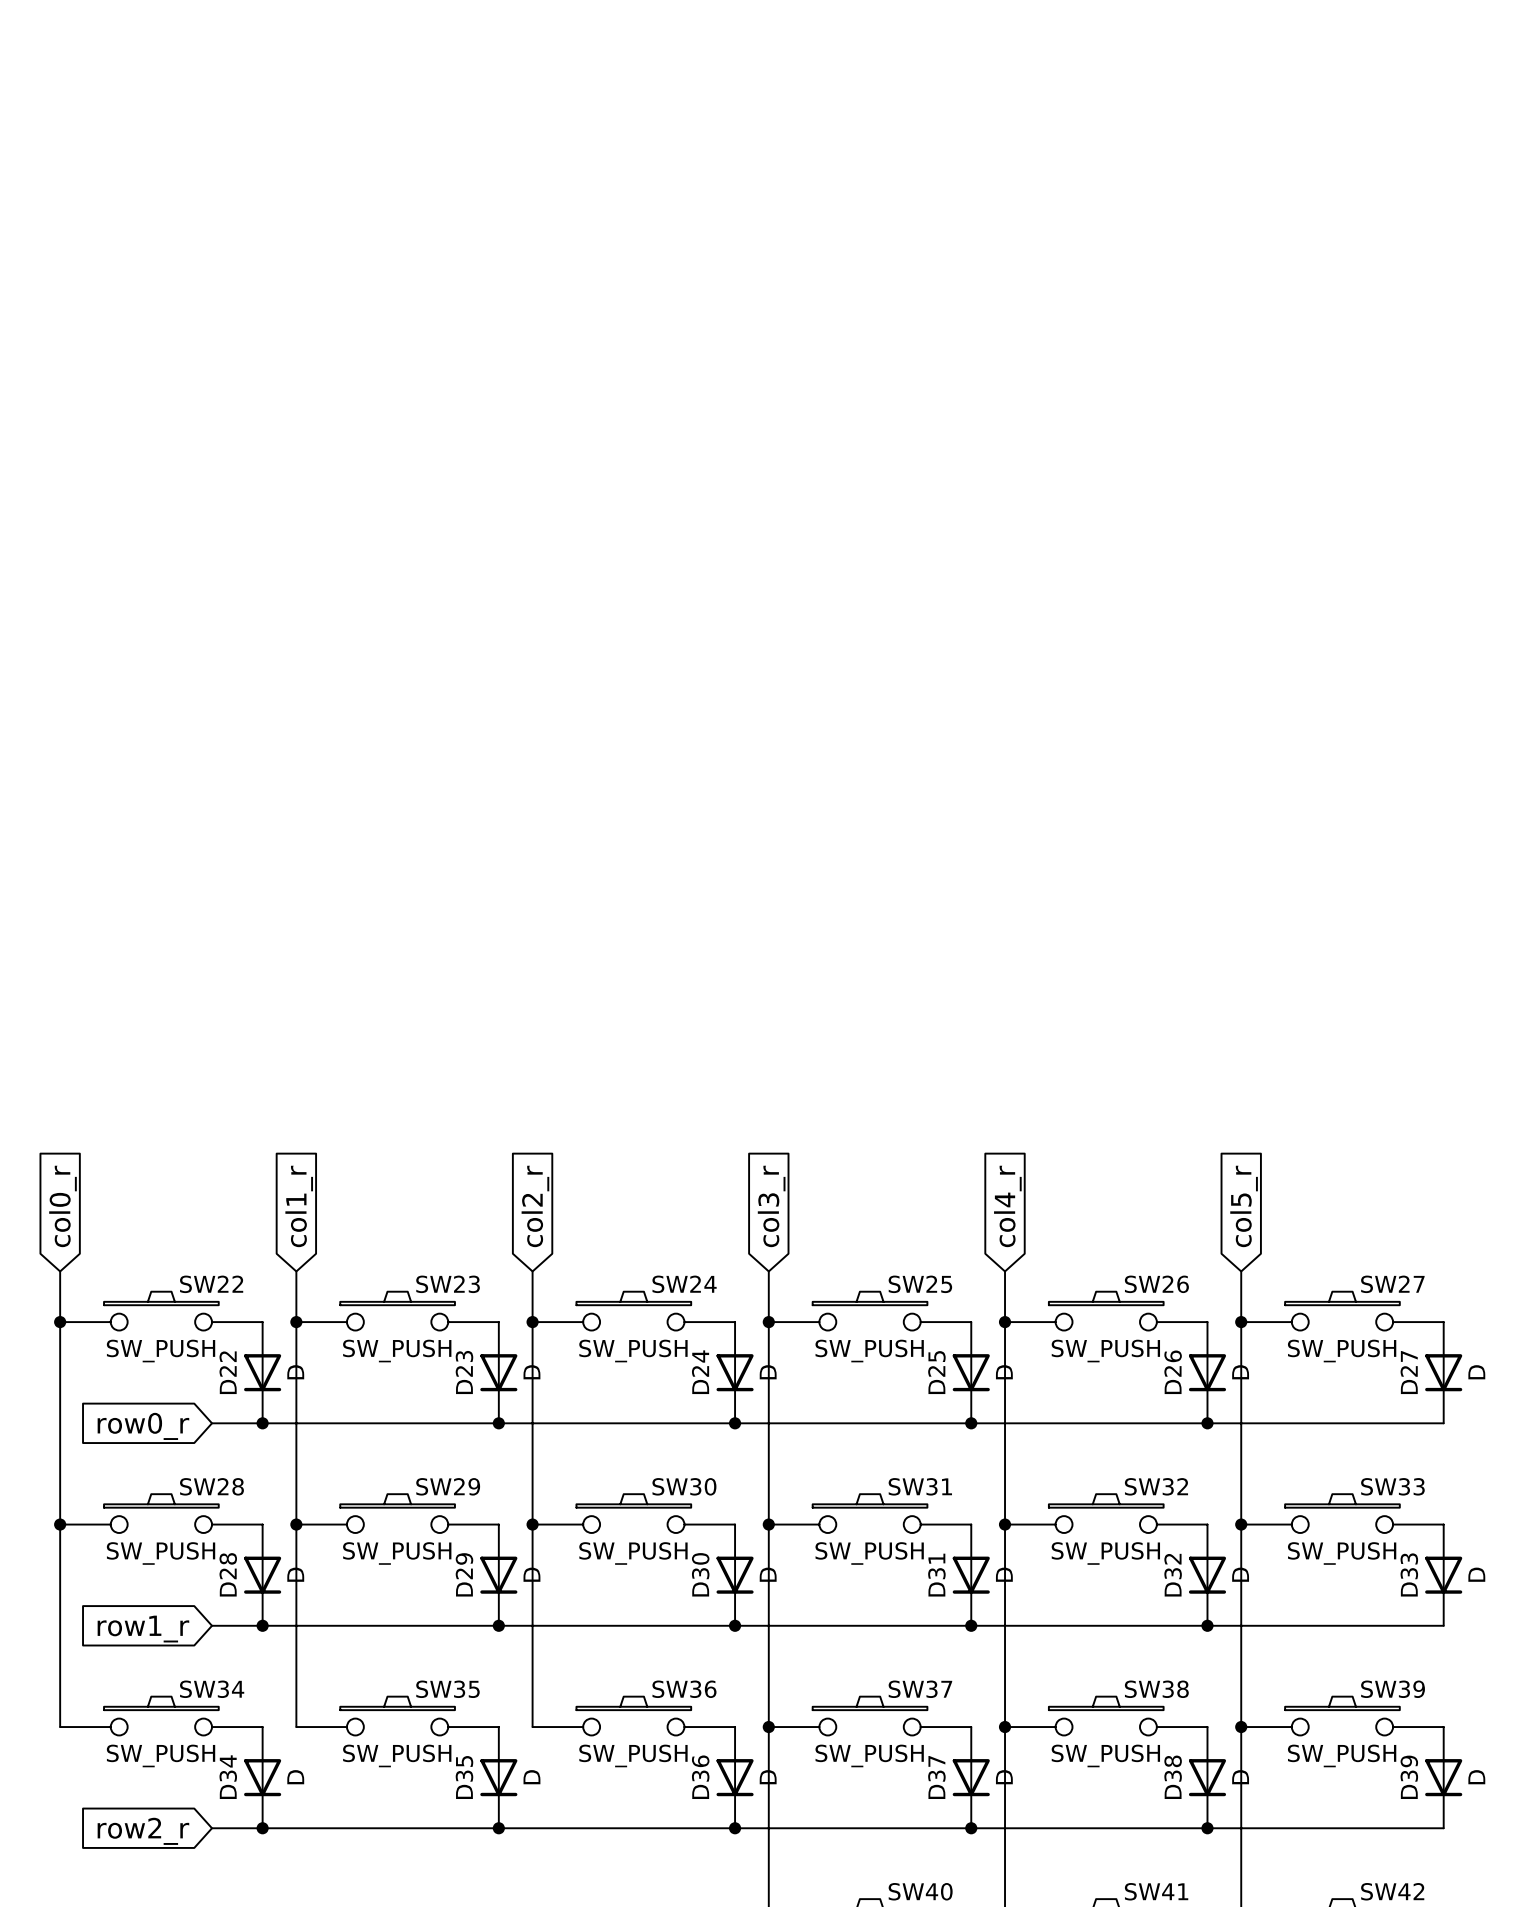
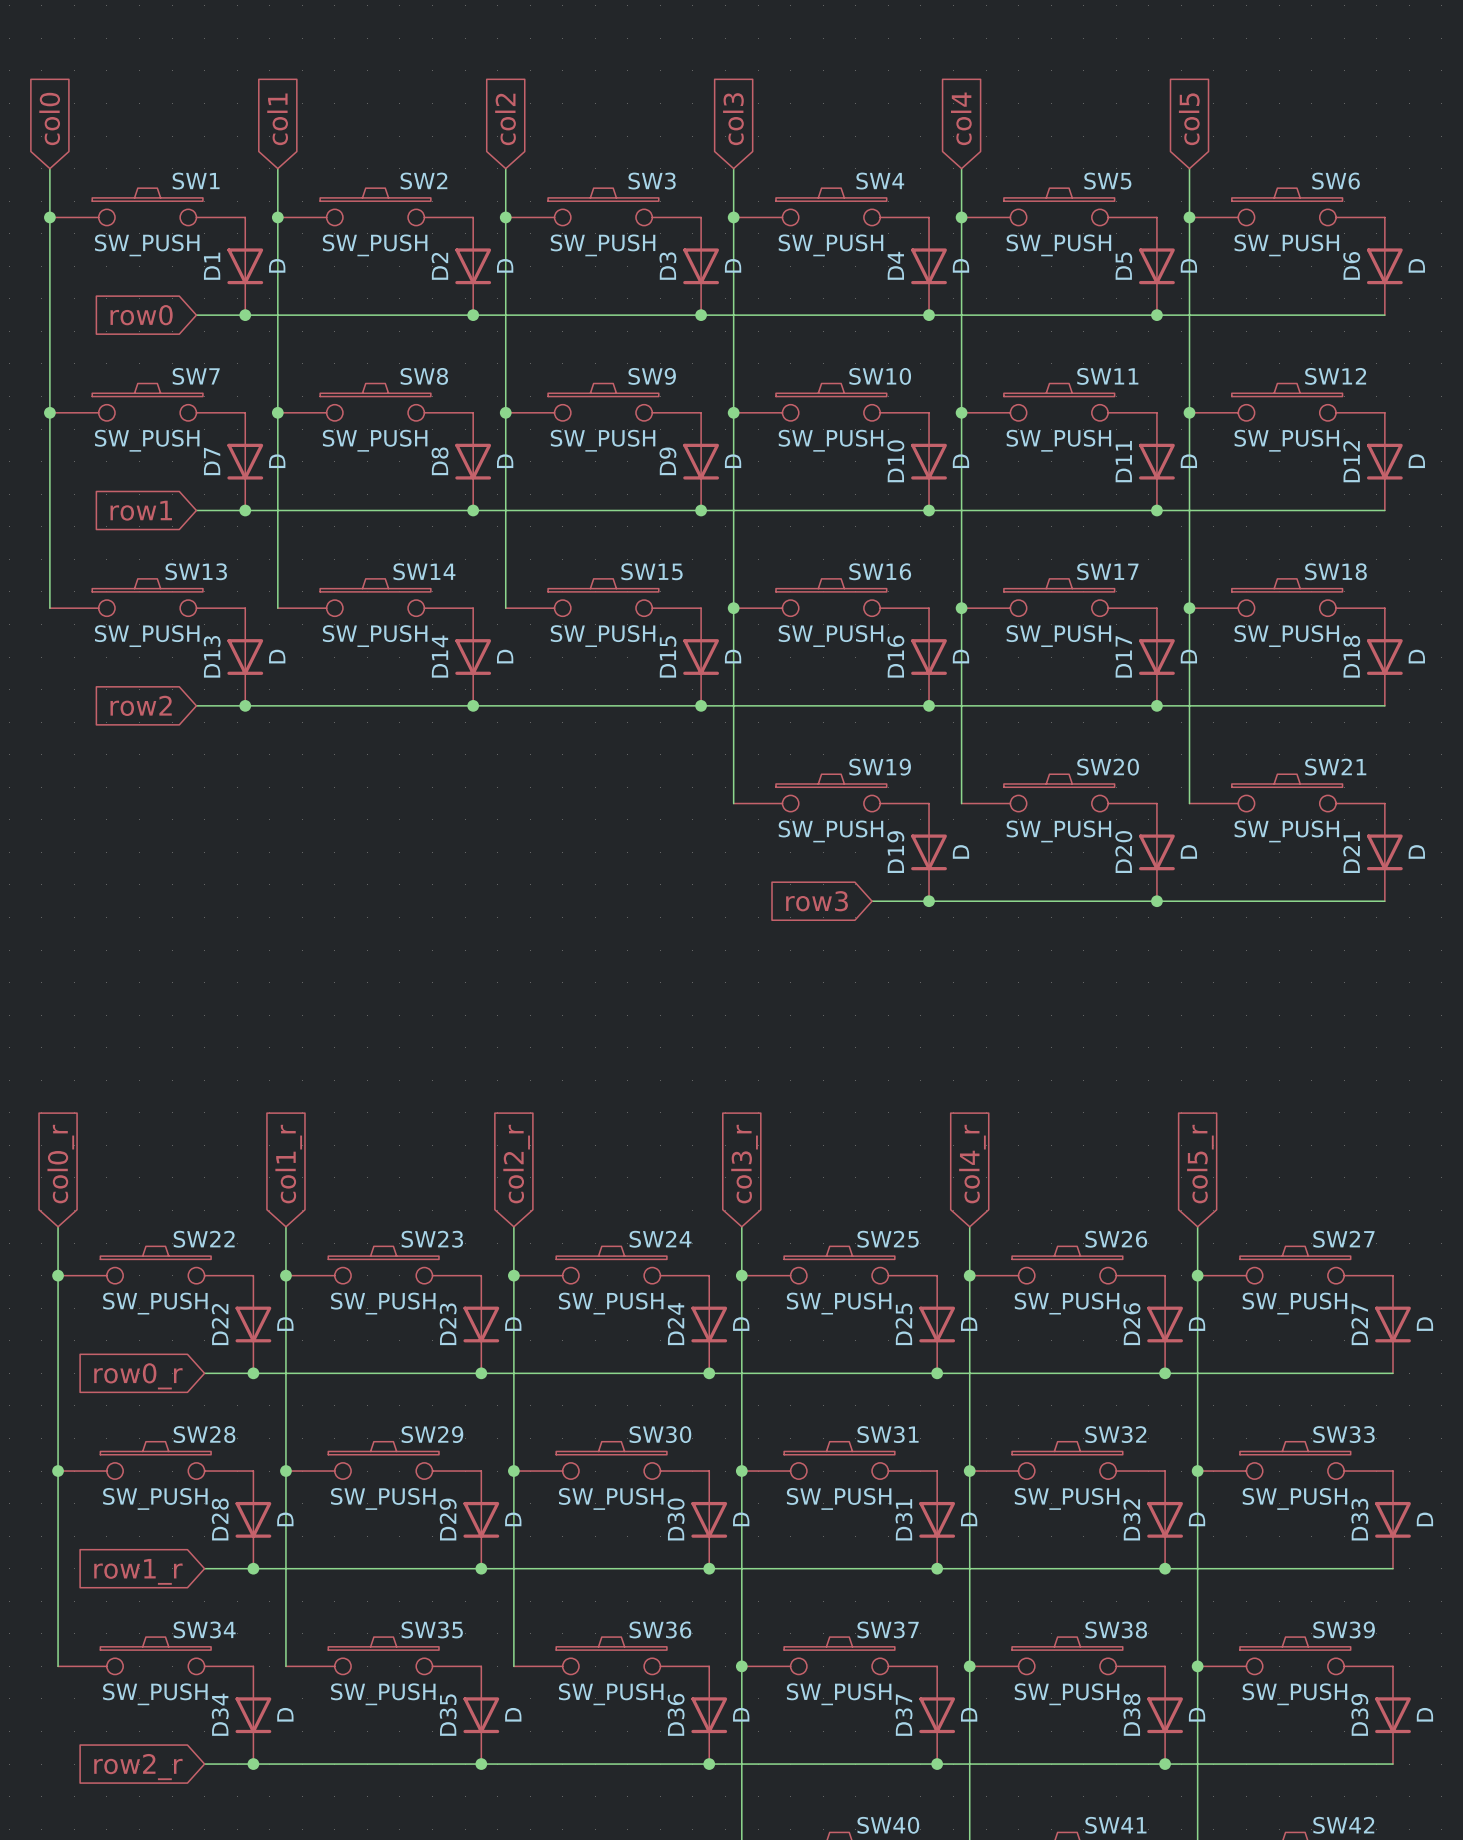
global label: none -> col0 (49, 118)
global label: none -> col1 (277, 119)
global label: none -> col2 (505, 119)
global label: none -> col3 (733, 119)
global label: none -> col4 (961, 118)
global label: none -> col5 (1189, 119)
wire: none -> (49, 168) (49, 608)
wire: none -> (277, 168) (277, 608)
wire: none -> (505, 168) (505, 608)
wire: none -> (733, 168) (733, 803)
wire: none -> (961, 168) (961, 803)
wire: none -> (1189, 168) (1189, 803)
SW1: none -> SW_PUSH (147, 206)
SW2: none -> SW_PUSH (375, 206)
SW3: none -> SW_PUSH (603, 206)
SW4: none -> SW_PUSH (831, 206)
SW5: none -> SW_PUSH (1059, 206)
SW6: none -> SW_PUSH (1287, 206)
junction: none -> (49, 217)
junction: none -> (277, 217)
junction: none -> (505, 217)
junction: none -> (733, 217)
junction: none -> (961, 217)
junction: none -> (1189, 217)
D1: none -> D (245, 266)
D2: none -> D (473, 266)
D3: none -> D (701, 266)
D4: none -> D (929, 266)
D5: none -> D (1156, 266)
D6: none -> D (1384, 266)
global label: none -> row0 (141, 315)
wire: none -> (196, 315) (1384, 315)
junction: none -> (245, 315)
junction: none -> (473, 315)
junction: none -> (701, 315)
junction: none -> (929, 315)
junction: none -> (1156, 315)
SW7: none -> SW_PUSH (147, 402)
SW8: none -> SW_PUSH (375, 402)
SW9: none -> SW_PUSH (603, 402)
SW10: none -> SW_PUSH (831, 402)
SW11: none -> SW_PUSH (1059, 402)
SW12: none -> SW_PUSH (1287, 402)
junction: none -> (49, 412)
junction: none -> (277, 412)
junction: none -> (505, 412)
junction: none -> (733, 412)
junction: none -> (961, 412)
junction: none -> (1189, 412)
D7: none -> D (245, 461)
D8: none -> D (473, 461)
D9: none -> D (701, 461)
D10: none -> D (929, 461)
D11: none -> D (1156, 461)
D12: none -> D (1384, 461)
global label: none -> row1 (141, 510)
wire: none -> (196, 510) (1384, 510)
junction: none -> (245, 510)
junction: none -> (473, 510)
junction: none -> (701, 510)
junction: none -> (929, 510)
junction: none -> (1156, 510)
SW13: none -> SW_PUSH (147, 597)
SW14: none -> SW_PUSH (375, 597)
SW15: none -> SW_PUSH (603, 597)
SW16: none -> SW_PUSH (831, 597)
SW17: none -> SW_PUSH (1059, 597)
SW18: none -> SW_PUSH (1287, 597)
junction: none -> (733, 608)
junction: none -> (961, 608)
junction: none -> (1189, 608)
D13: none -> D (245, 657)
D14: none -> D (473, 657)
D15: none -> D (701, 657)
D16: none -> D (929, 657)
D17: none -> D (1156, 657)
D18: none -> D (1384, 657)
global label: none -> row2 (141, 705)
wire: none -> (196, 705) (1384, 705)
junction: none -> (245, 705)
junction: none -> (473, 705)
junction: none -> (701, 705)
junction: none -> (929, 705)
junction: none -> (1156, 705)
SW19: none -> SW_PUSH (831, 792)
SW20: none -> SW_PUSH (1059, 792)
SW21: none -> SW_PUSH (1287, 792)
D19: none -> D (929, 852)
D20: none -> D (1156, 852)
D21: none -> D (1384, 852)
global label: none -> row3 (817, 901)
wire: none -> (872, 901) (1384, 901)
junction: none -> (929, 901)
junction: none -> (1156, 901)

